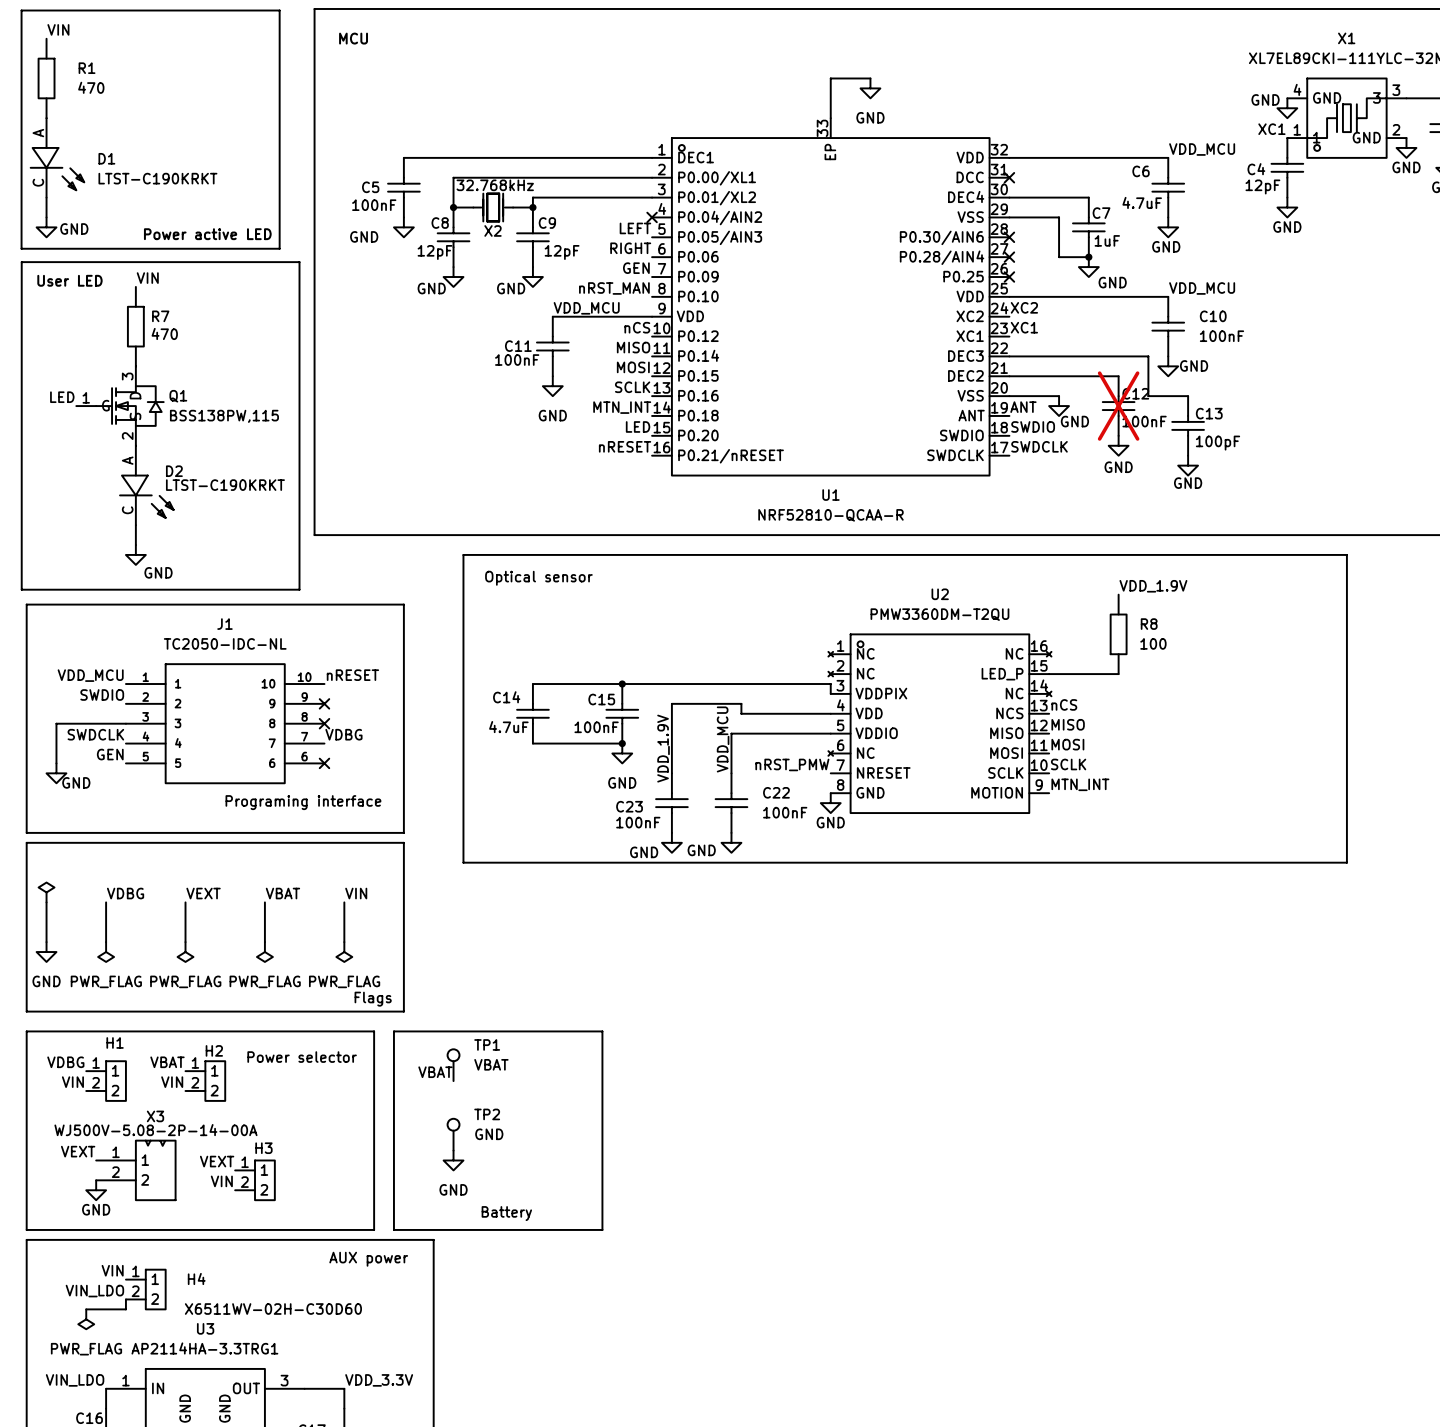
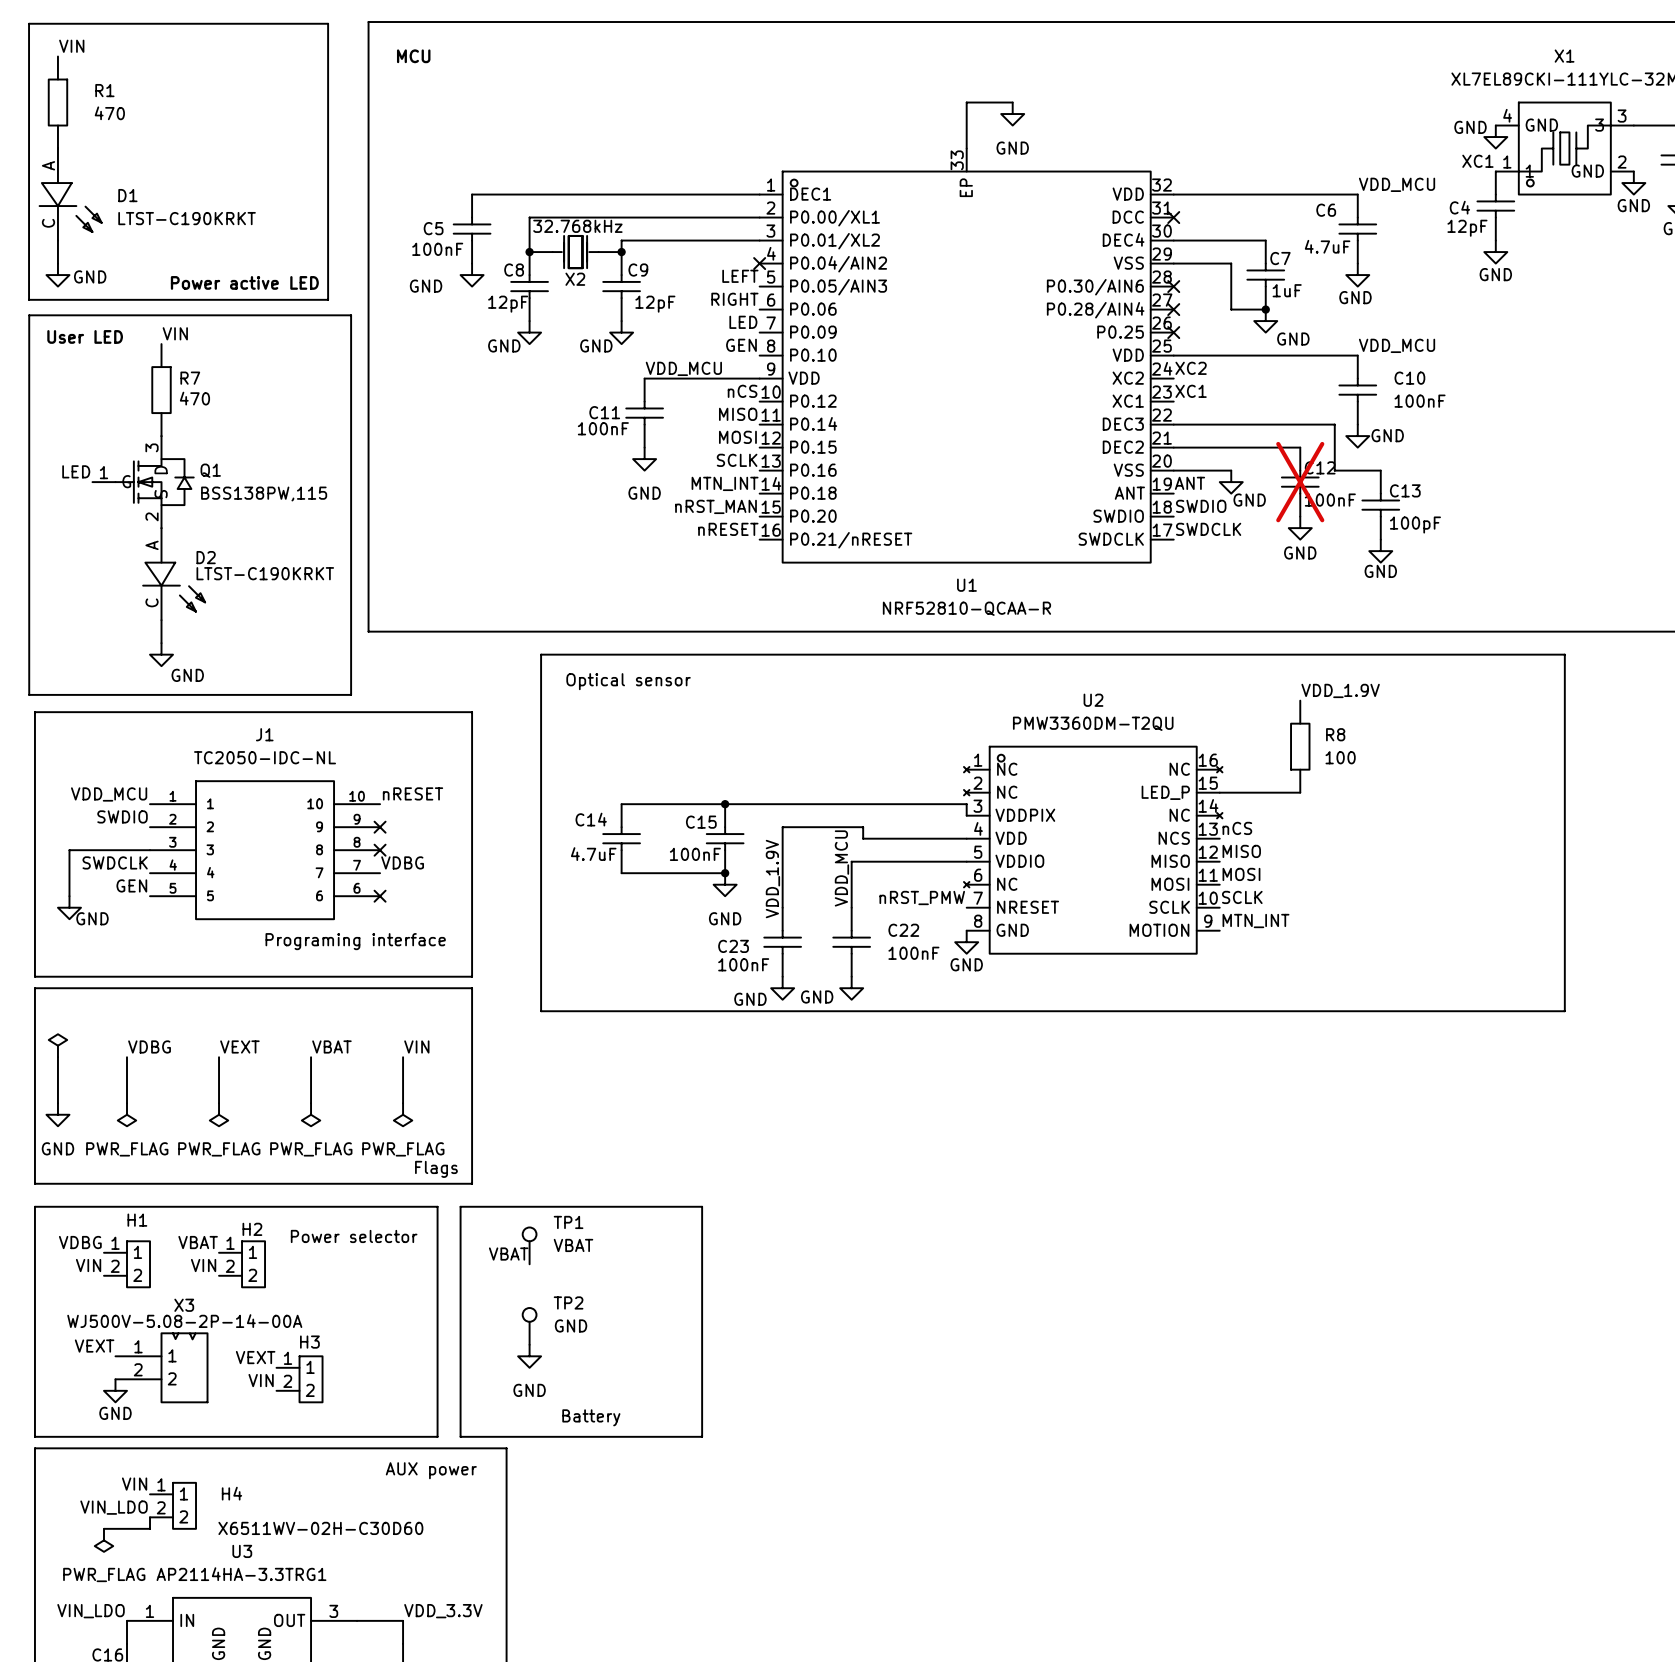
label: GEN (636, 268) -> LED (743, 322)
label: nRST_MAN (614, 288) -> GEN (741, 345)
label: LED (638, 426) -> nRST_MAN (716, 506)

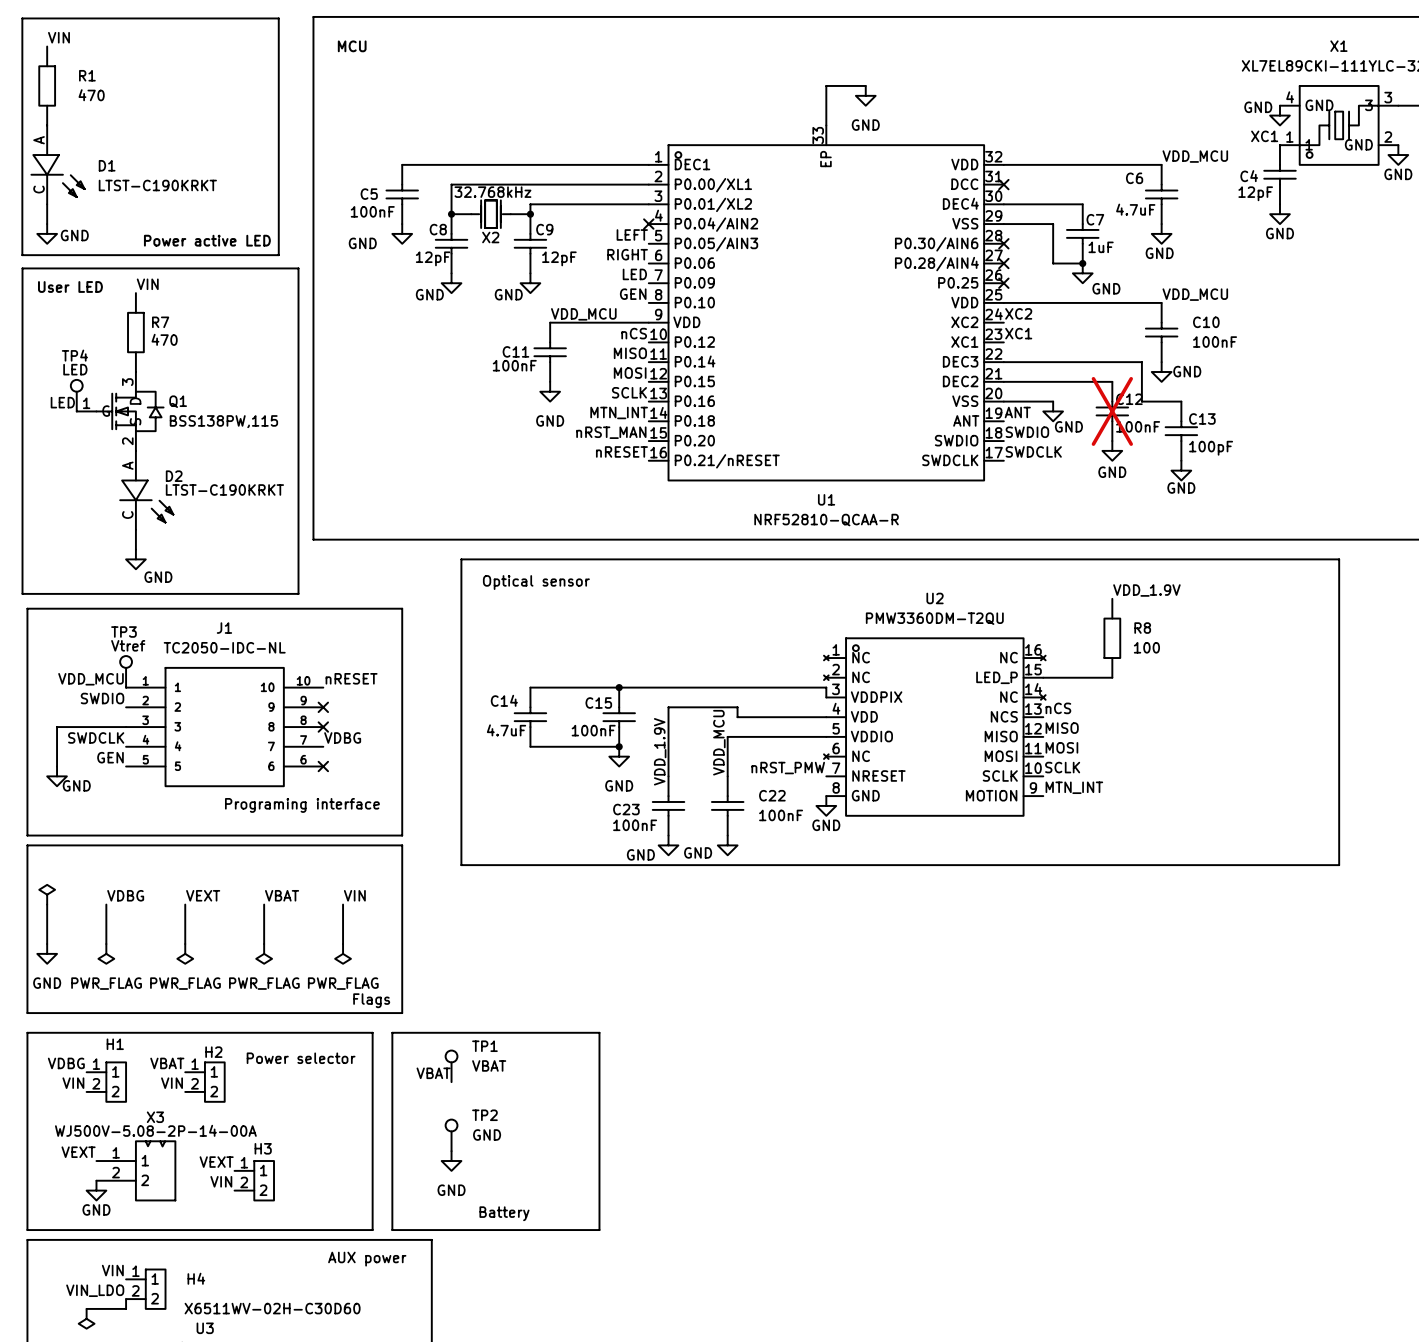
TP4: none -> LED (76, 395)
TP3: none -> Vtref (126, 671)

